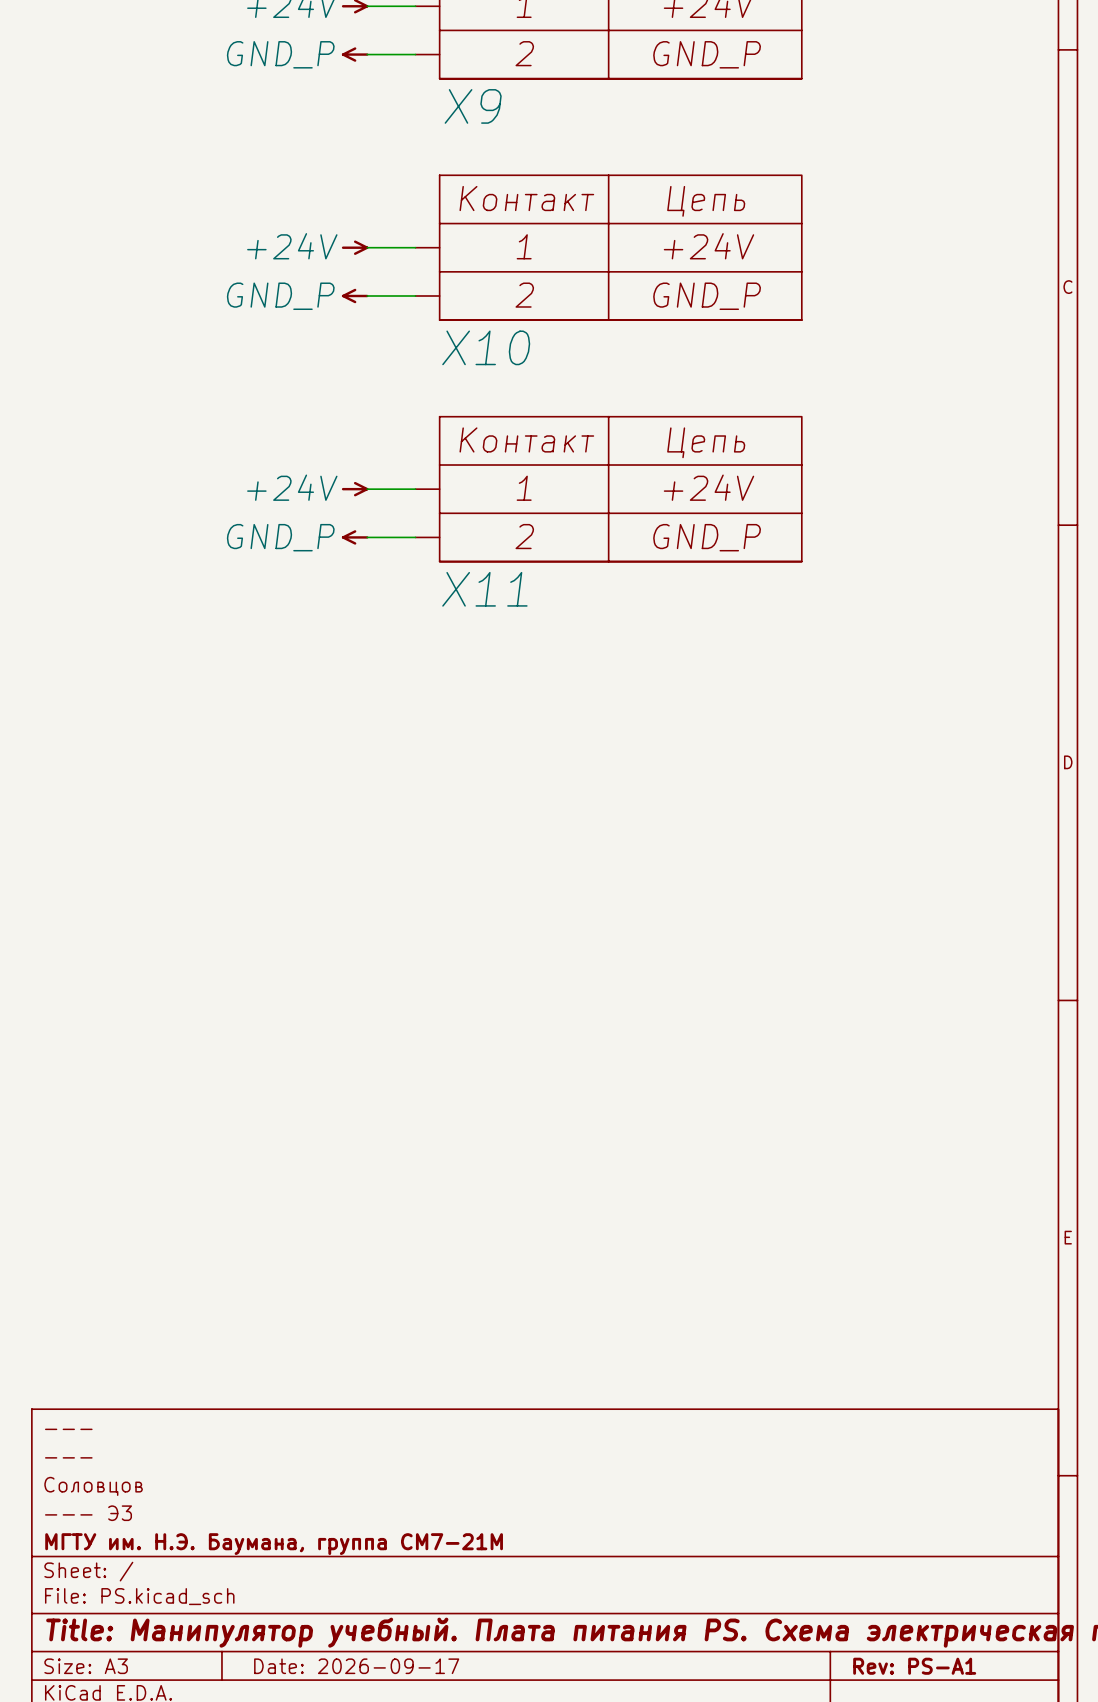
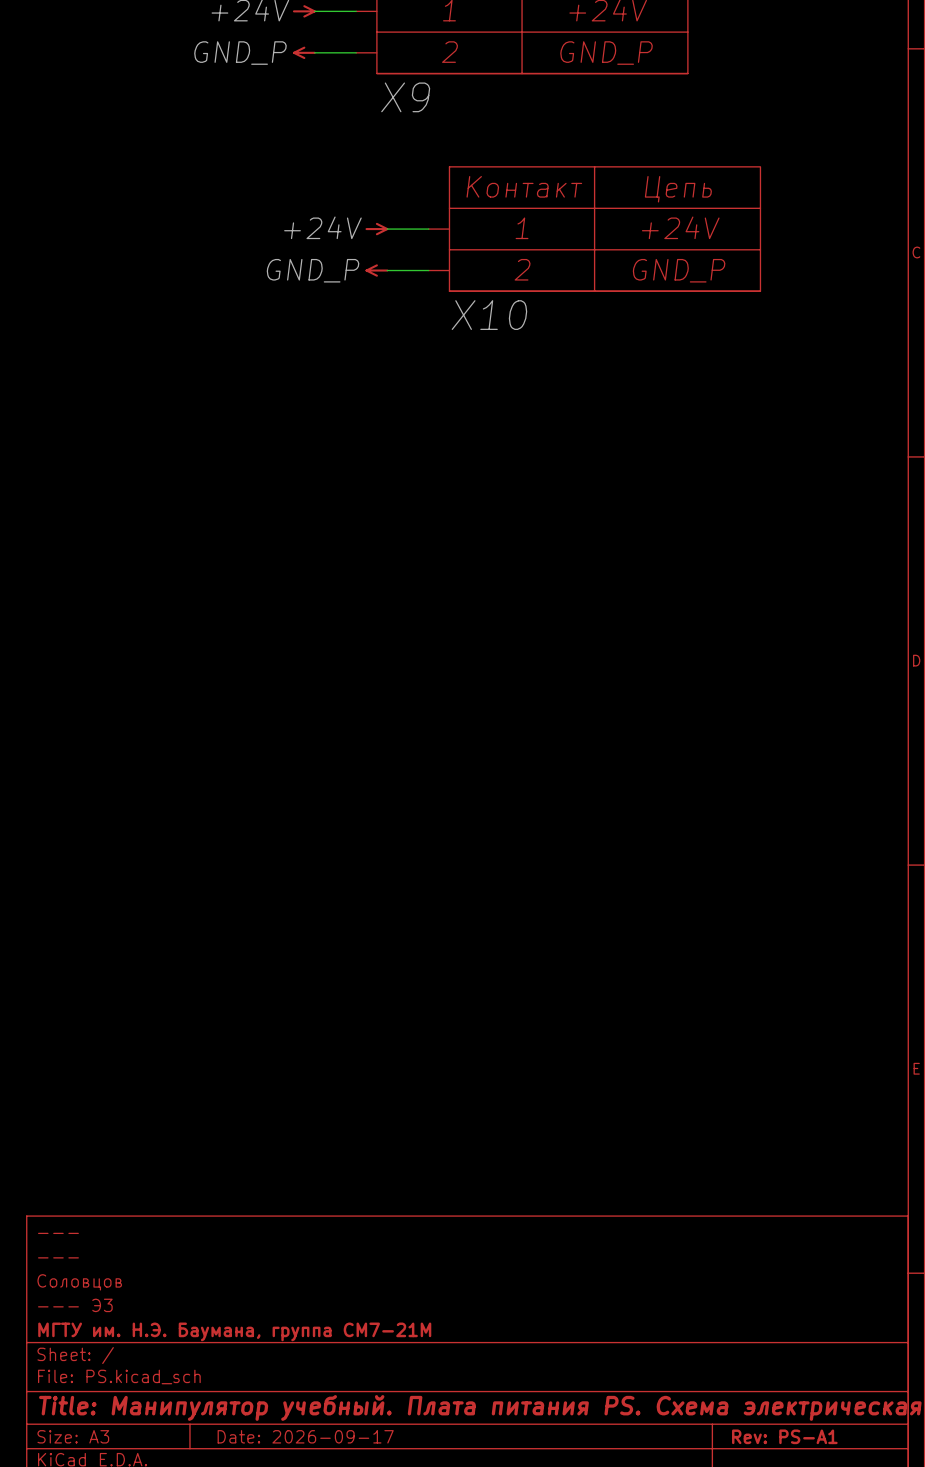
power symbol position: +24V (355, 247) -> +24V (376, 229)
wire: (367, 247) (415, 247) -> (387, 229) (428, 229)
X10 position: (609, 247) -> (594, 229)
power symbol position: GND_P (355, 295) -> GND_P (376, 270)
wire: (367, 295) (415, 295) -> (387, 270) (428, 270)
power symbol: +24V (355, 489) -> none
wire: (367, 489) (415, 489) -> none
X11: (609, 489) -> none
power symbol: GND_P (355, 537) -> none
wire: (367, 537) (415, 537) -> none

